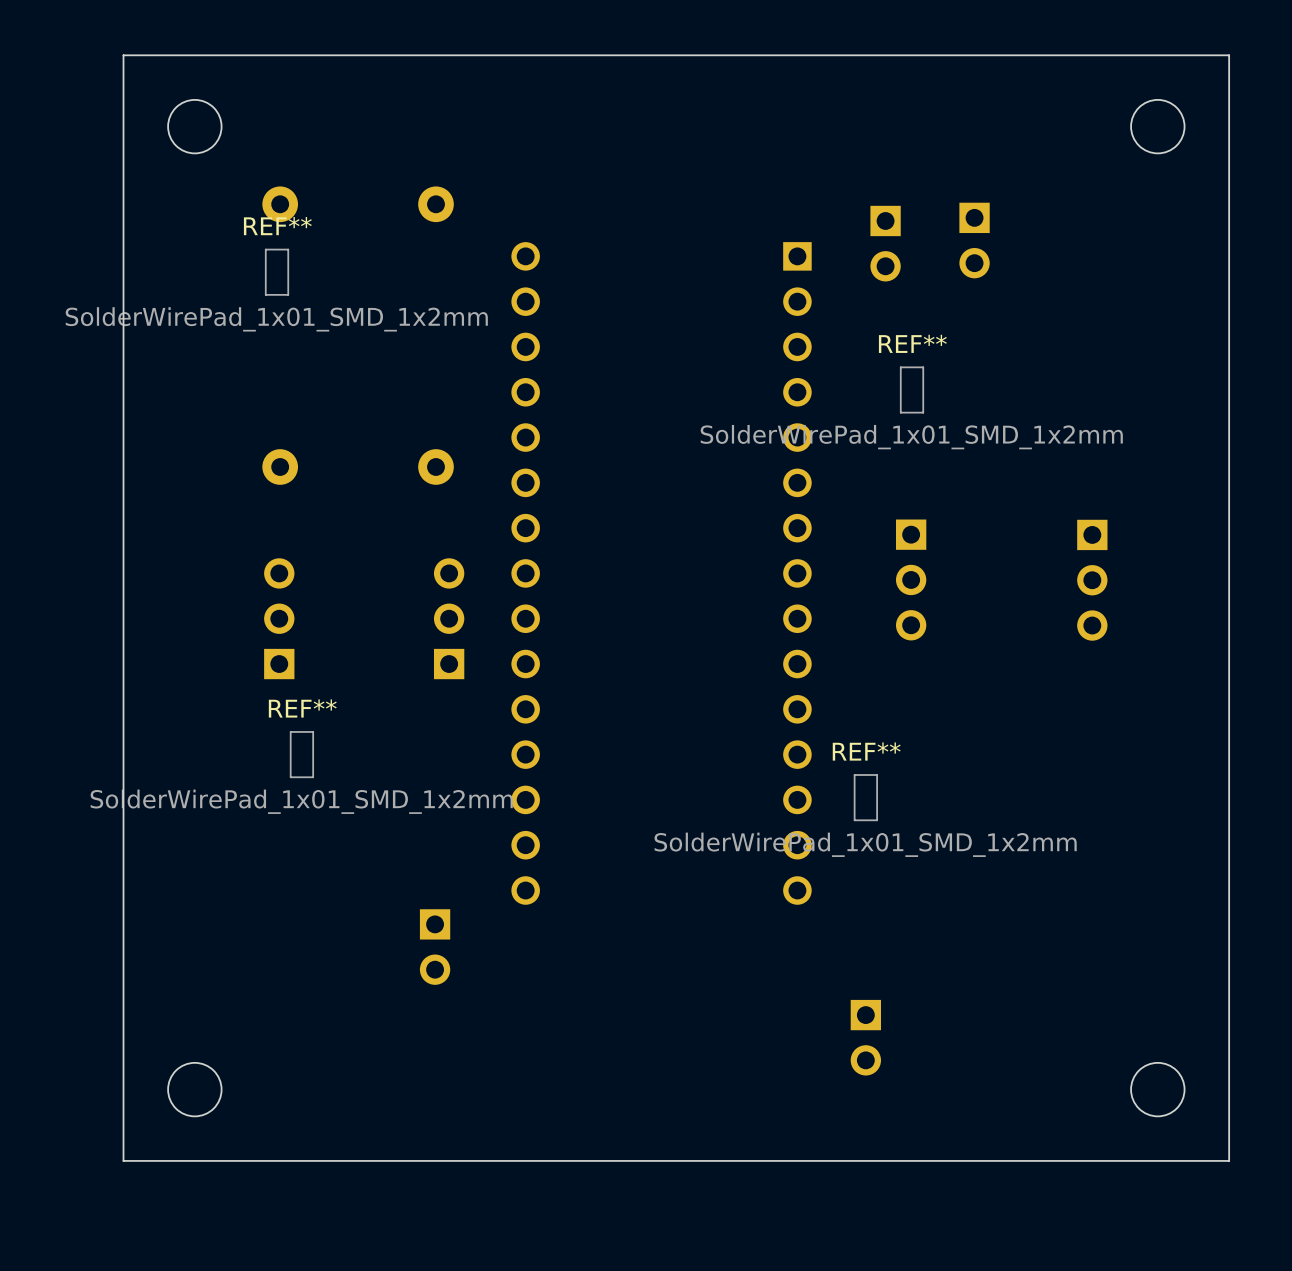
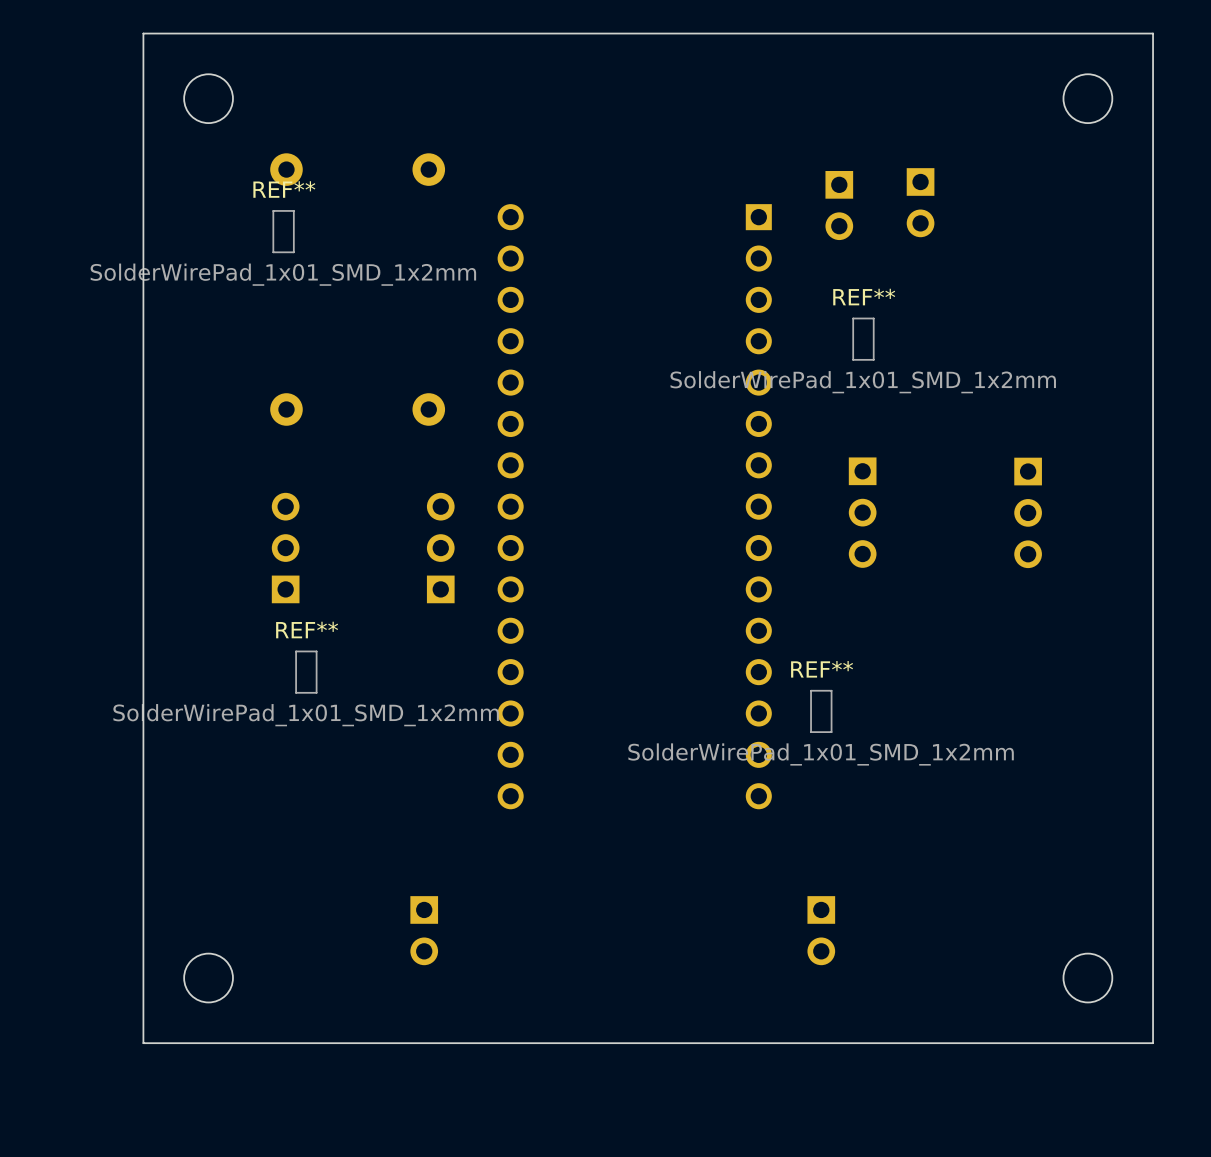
part position: (435, 947) -> (424, 930)

